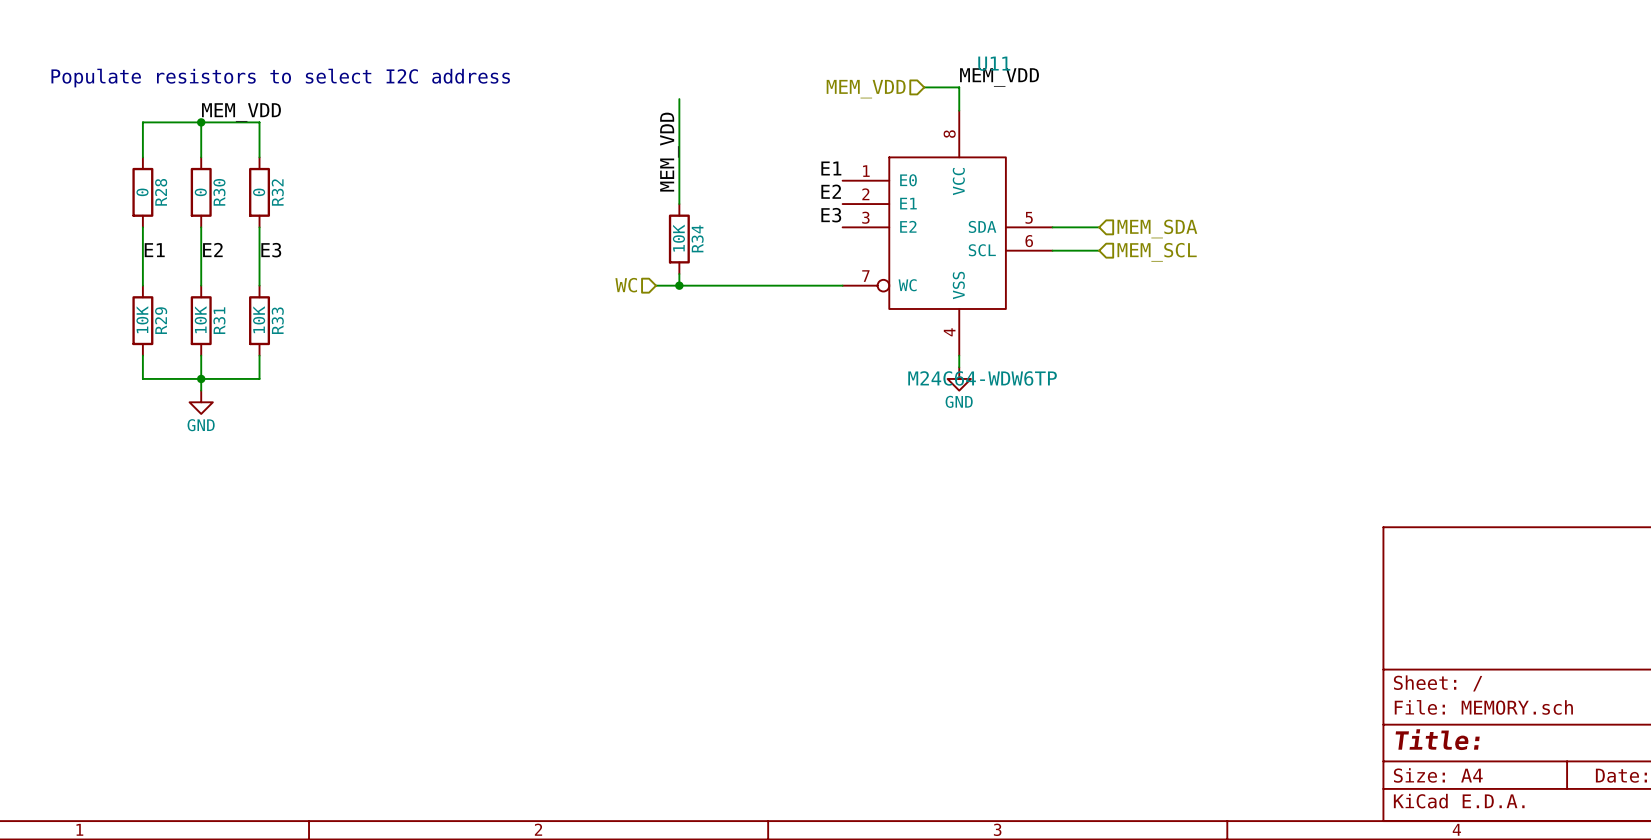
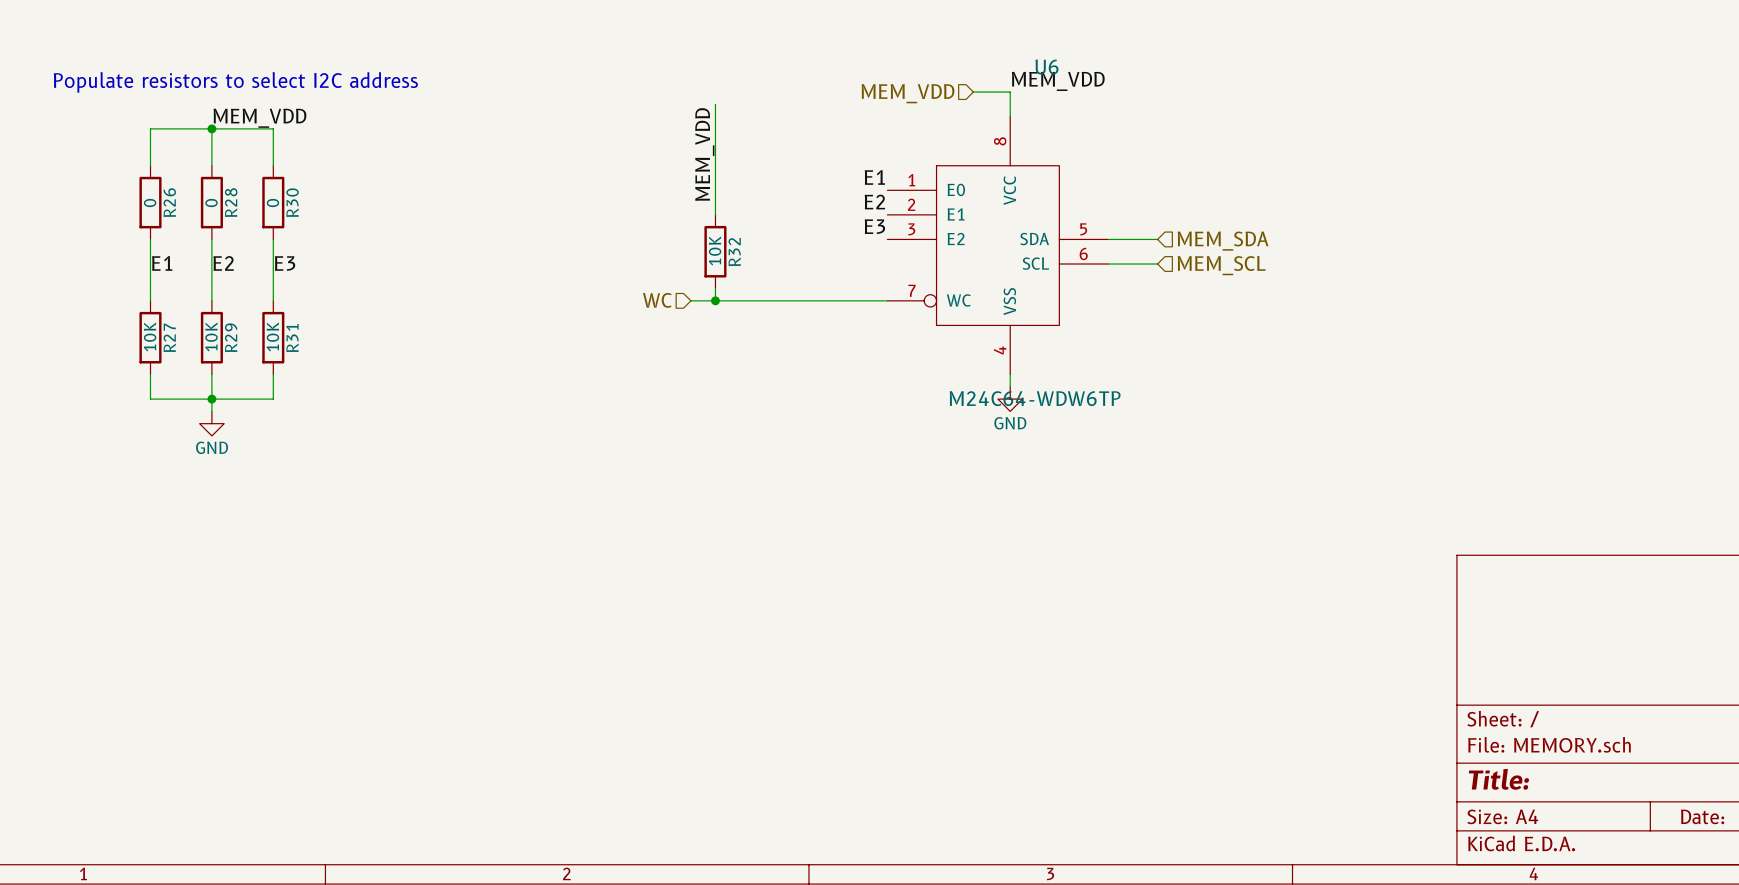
U11 name: U11 (994, 63) -> U6 (1046, 67)
R28 name: R28 (161, 192) -> R26 (169, 202)
R30 name: R30 (219, 192) -> R28 (231, 202)
R32 name: R32 (277, 192) -> R30 (292, 202)
R34 name: R34 (697, 238) -> R32 (734, 252)
R29 name: R29 (161, 320) -> R27 (169, 337)
R31 name: R31 (219, 320) -> R29 (231, 337)
R33 name: R33 (277, 320) -> R31 (292, 338)

